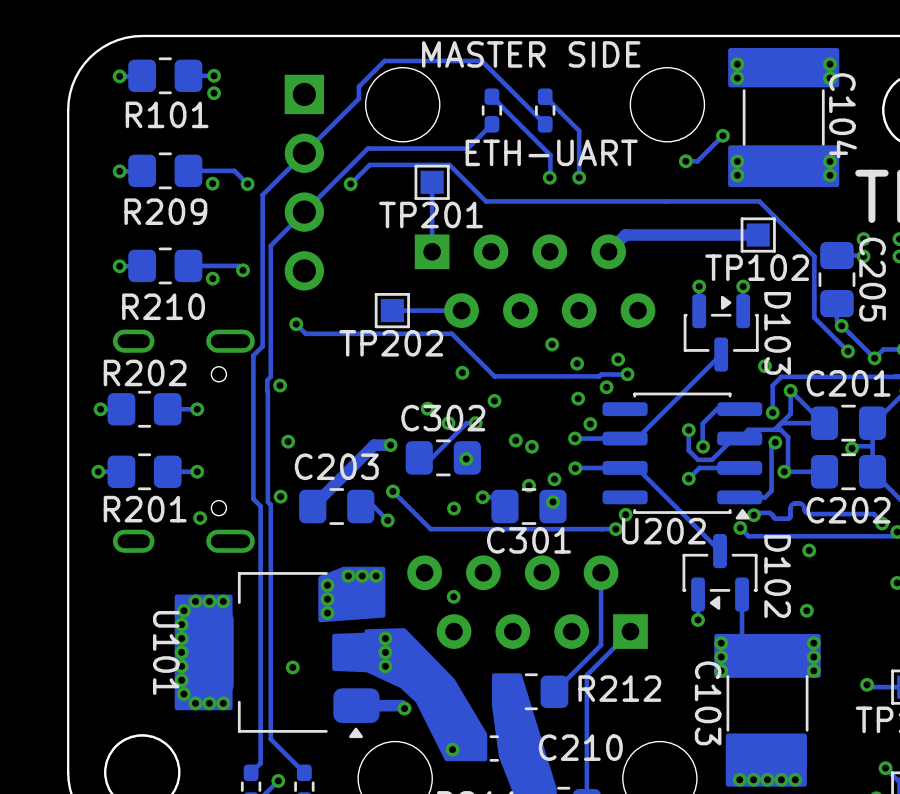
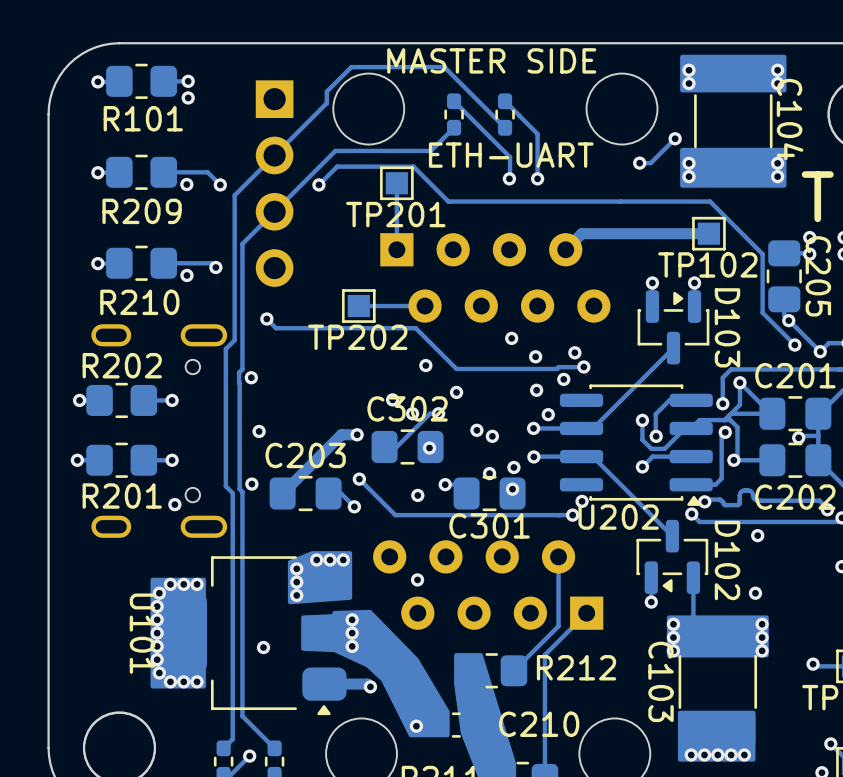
via: (764, 366) -> none

